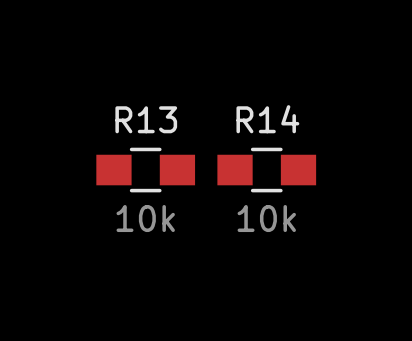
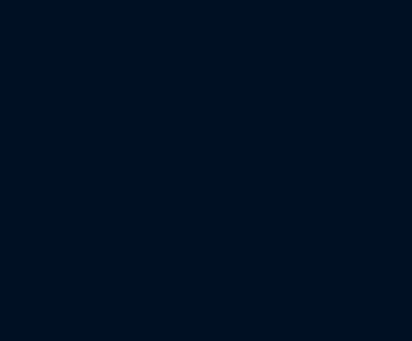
R13: 10k (145, 170) -> none
R14: 10k (266, 170) -> none

